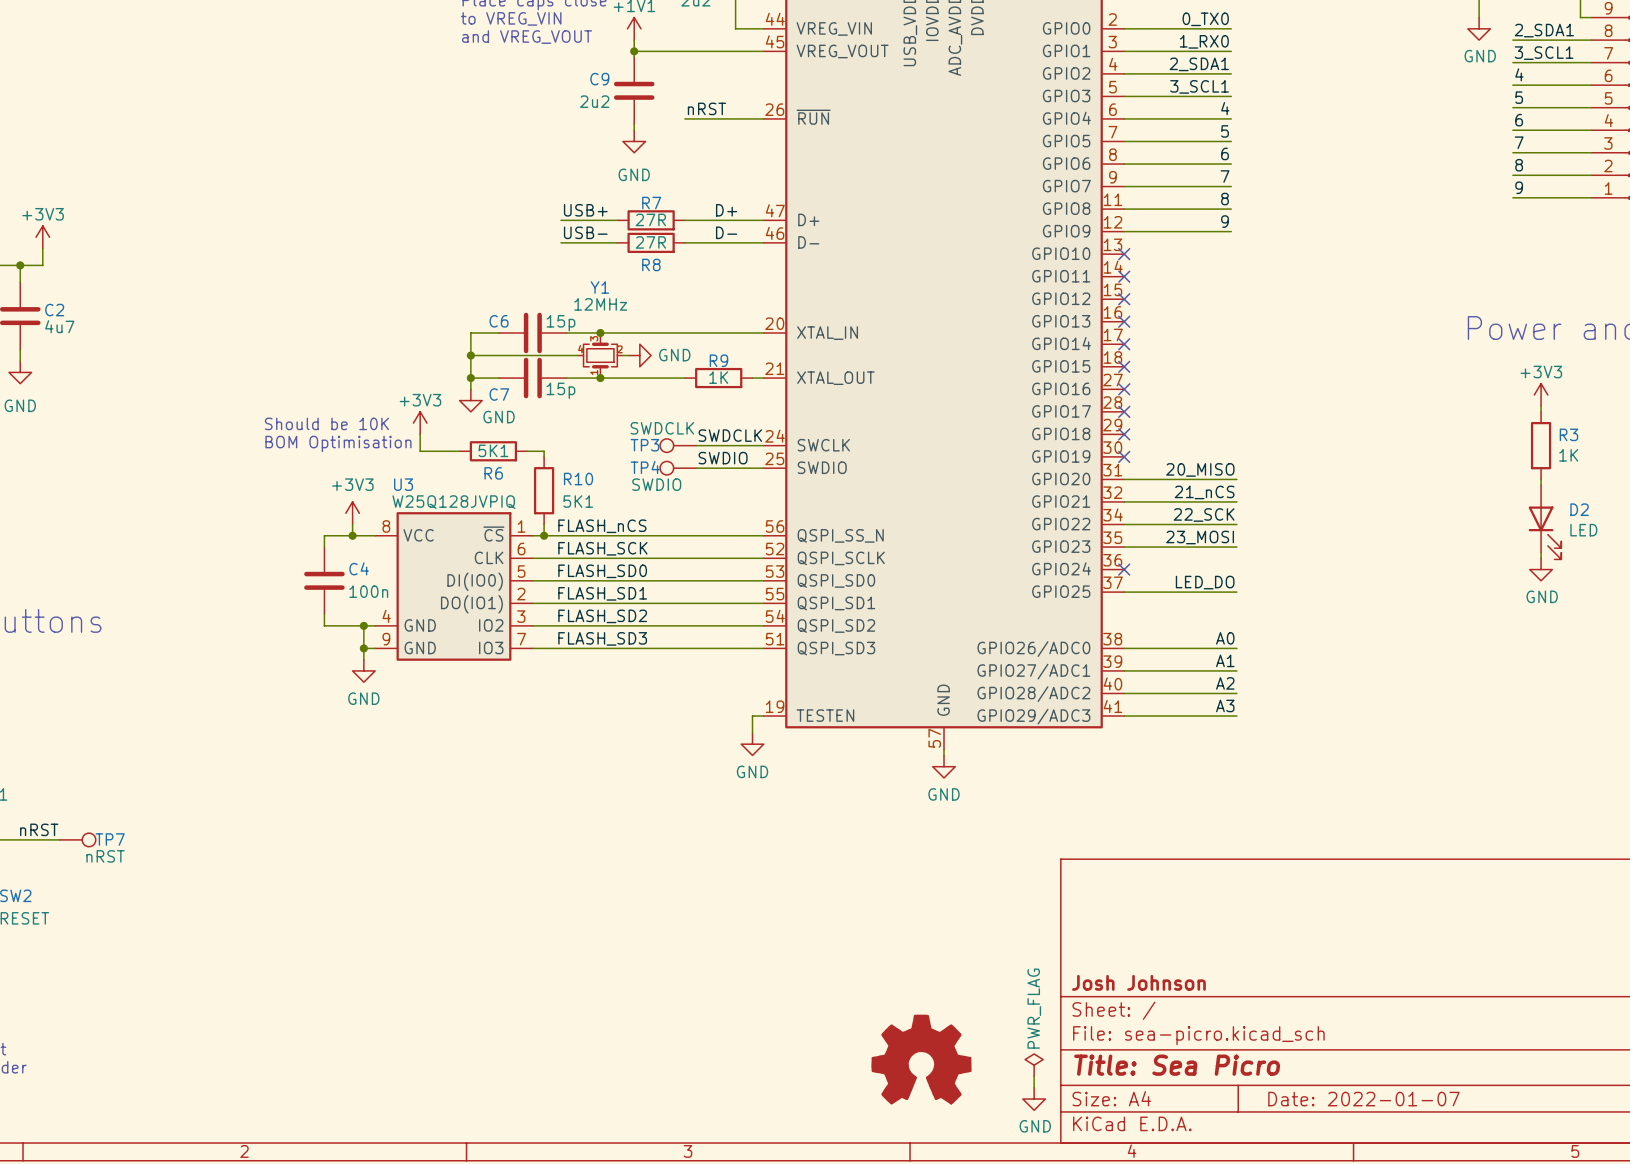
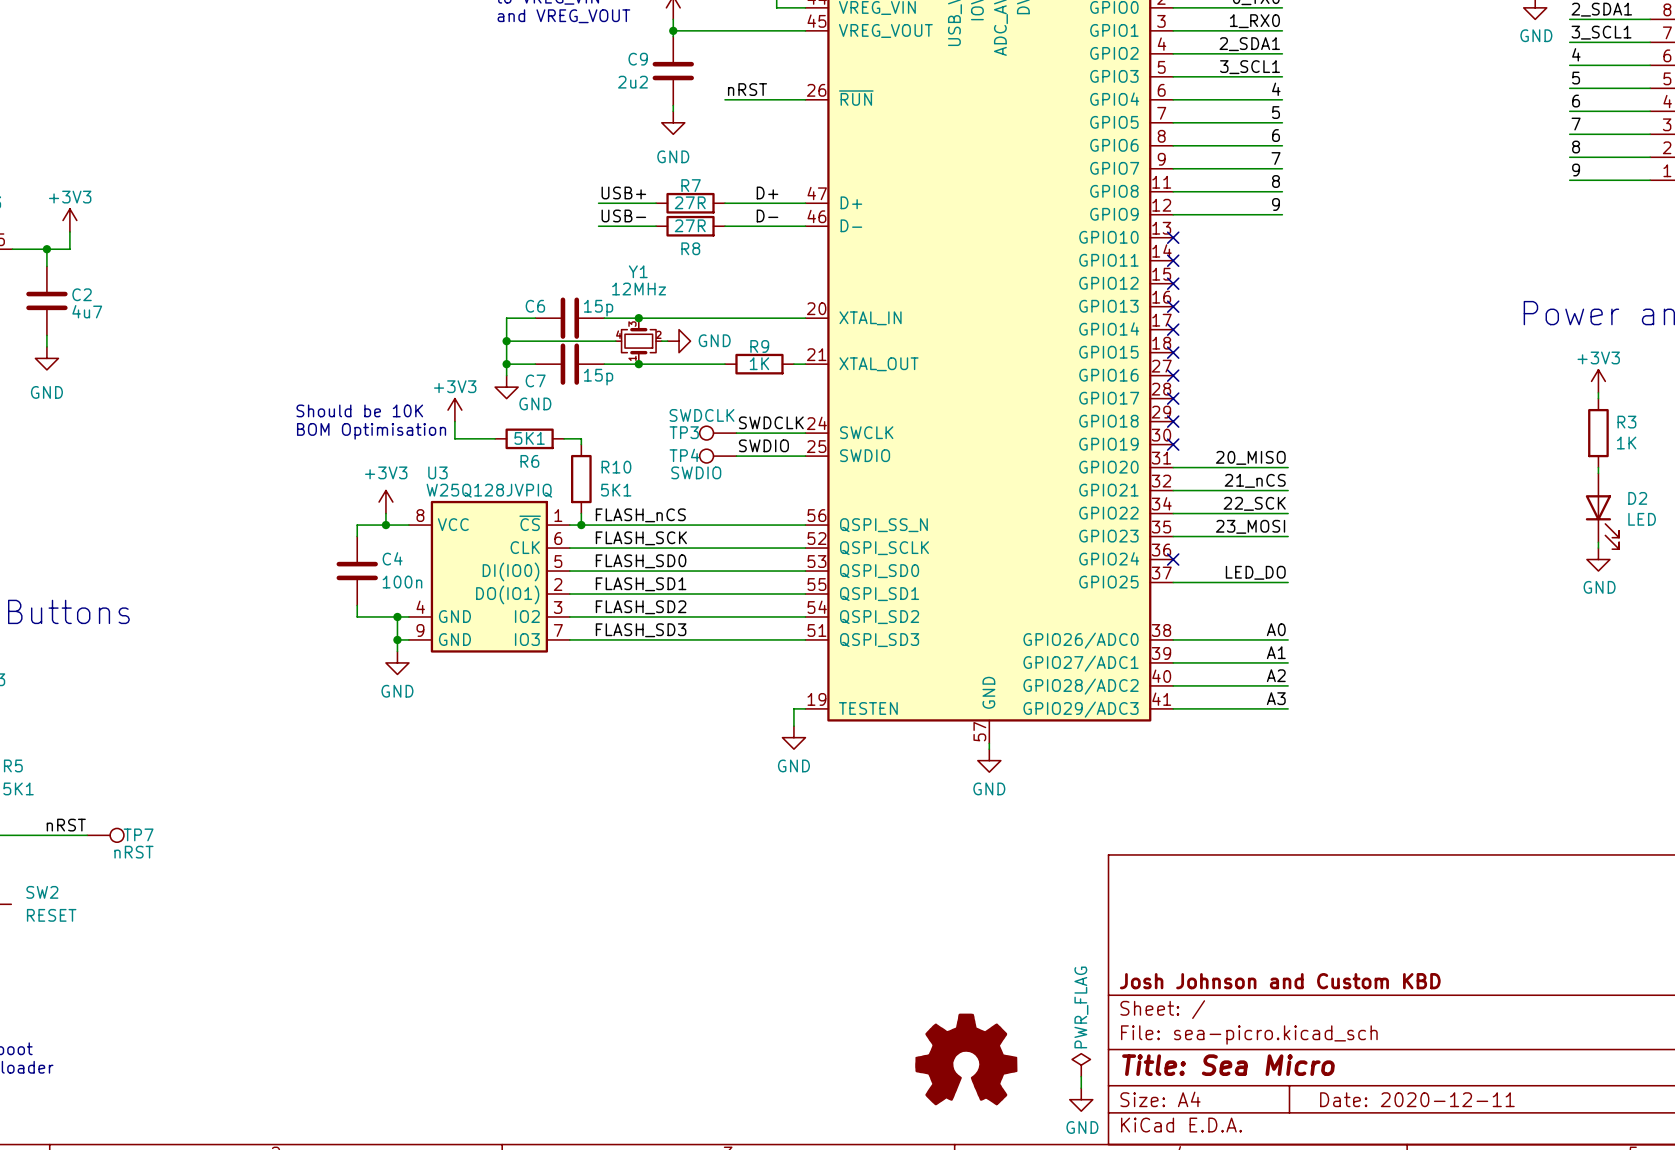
title block: Josh Johnson (1138, 982) -> Josh Johnson and Custom KBD (1280, 981)
title block: Title: Sea Picro (1177, 1065) -> Title: Sea Micro (1228, 1065)
title block: Date: 2022-01-07 (1363, 1099) -> Date: 2020-12-11 (1417, 1099)

